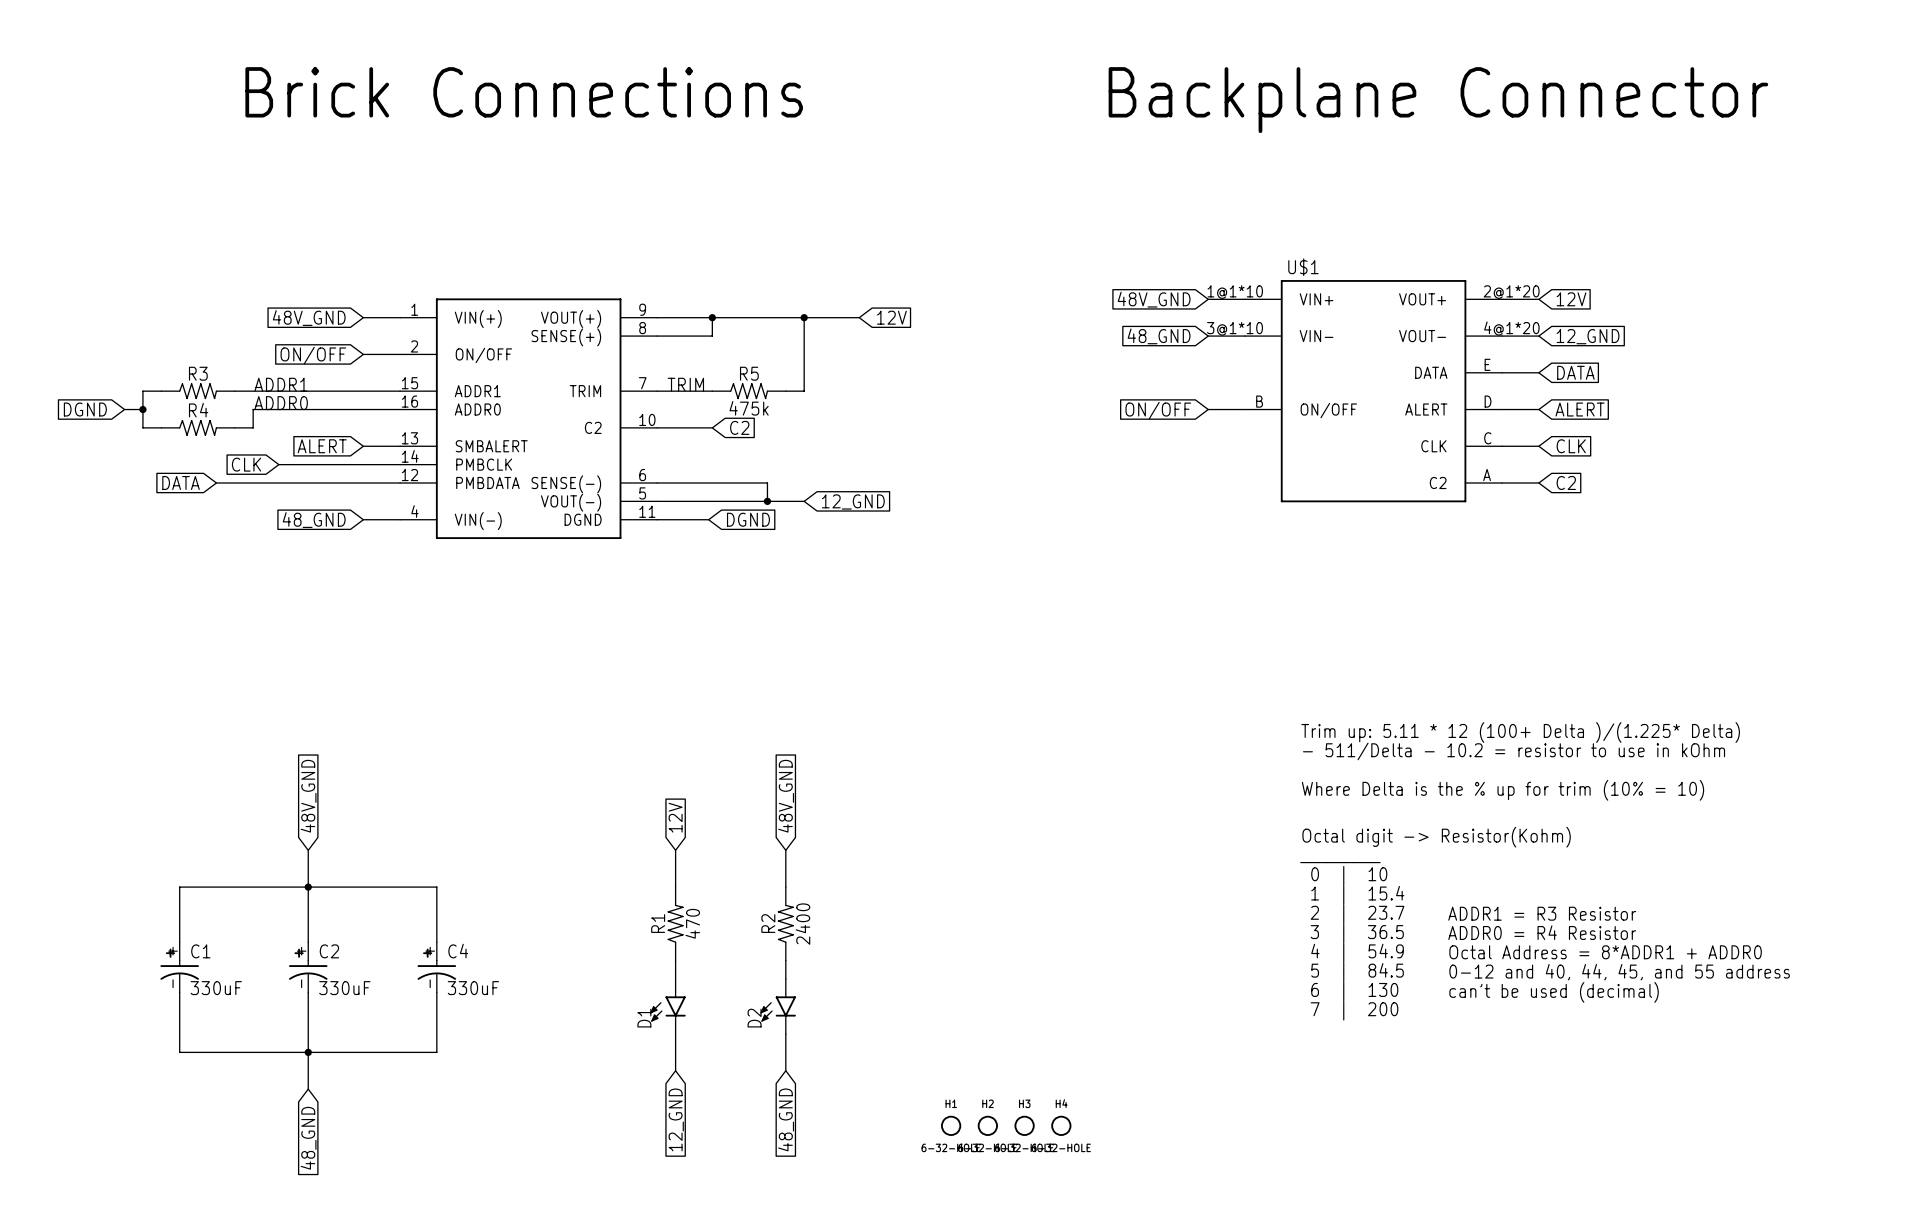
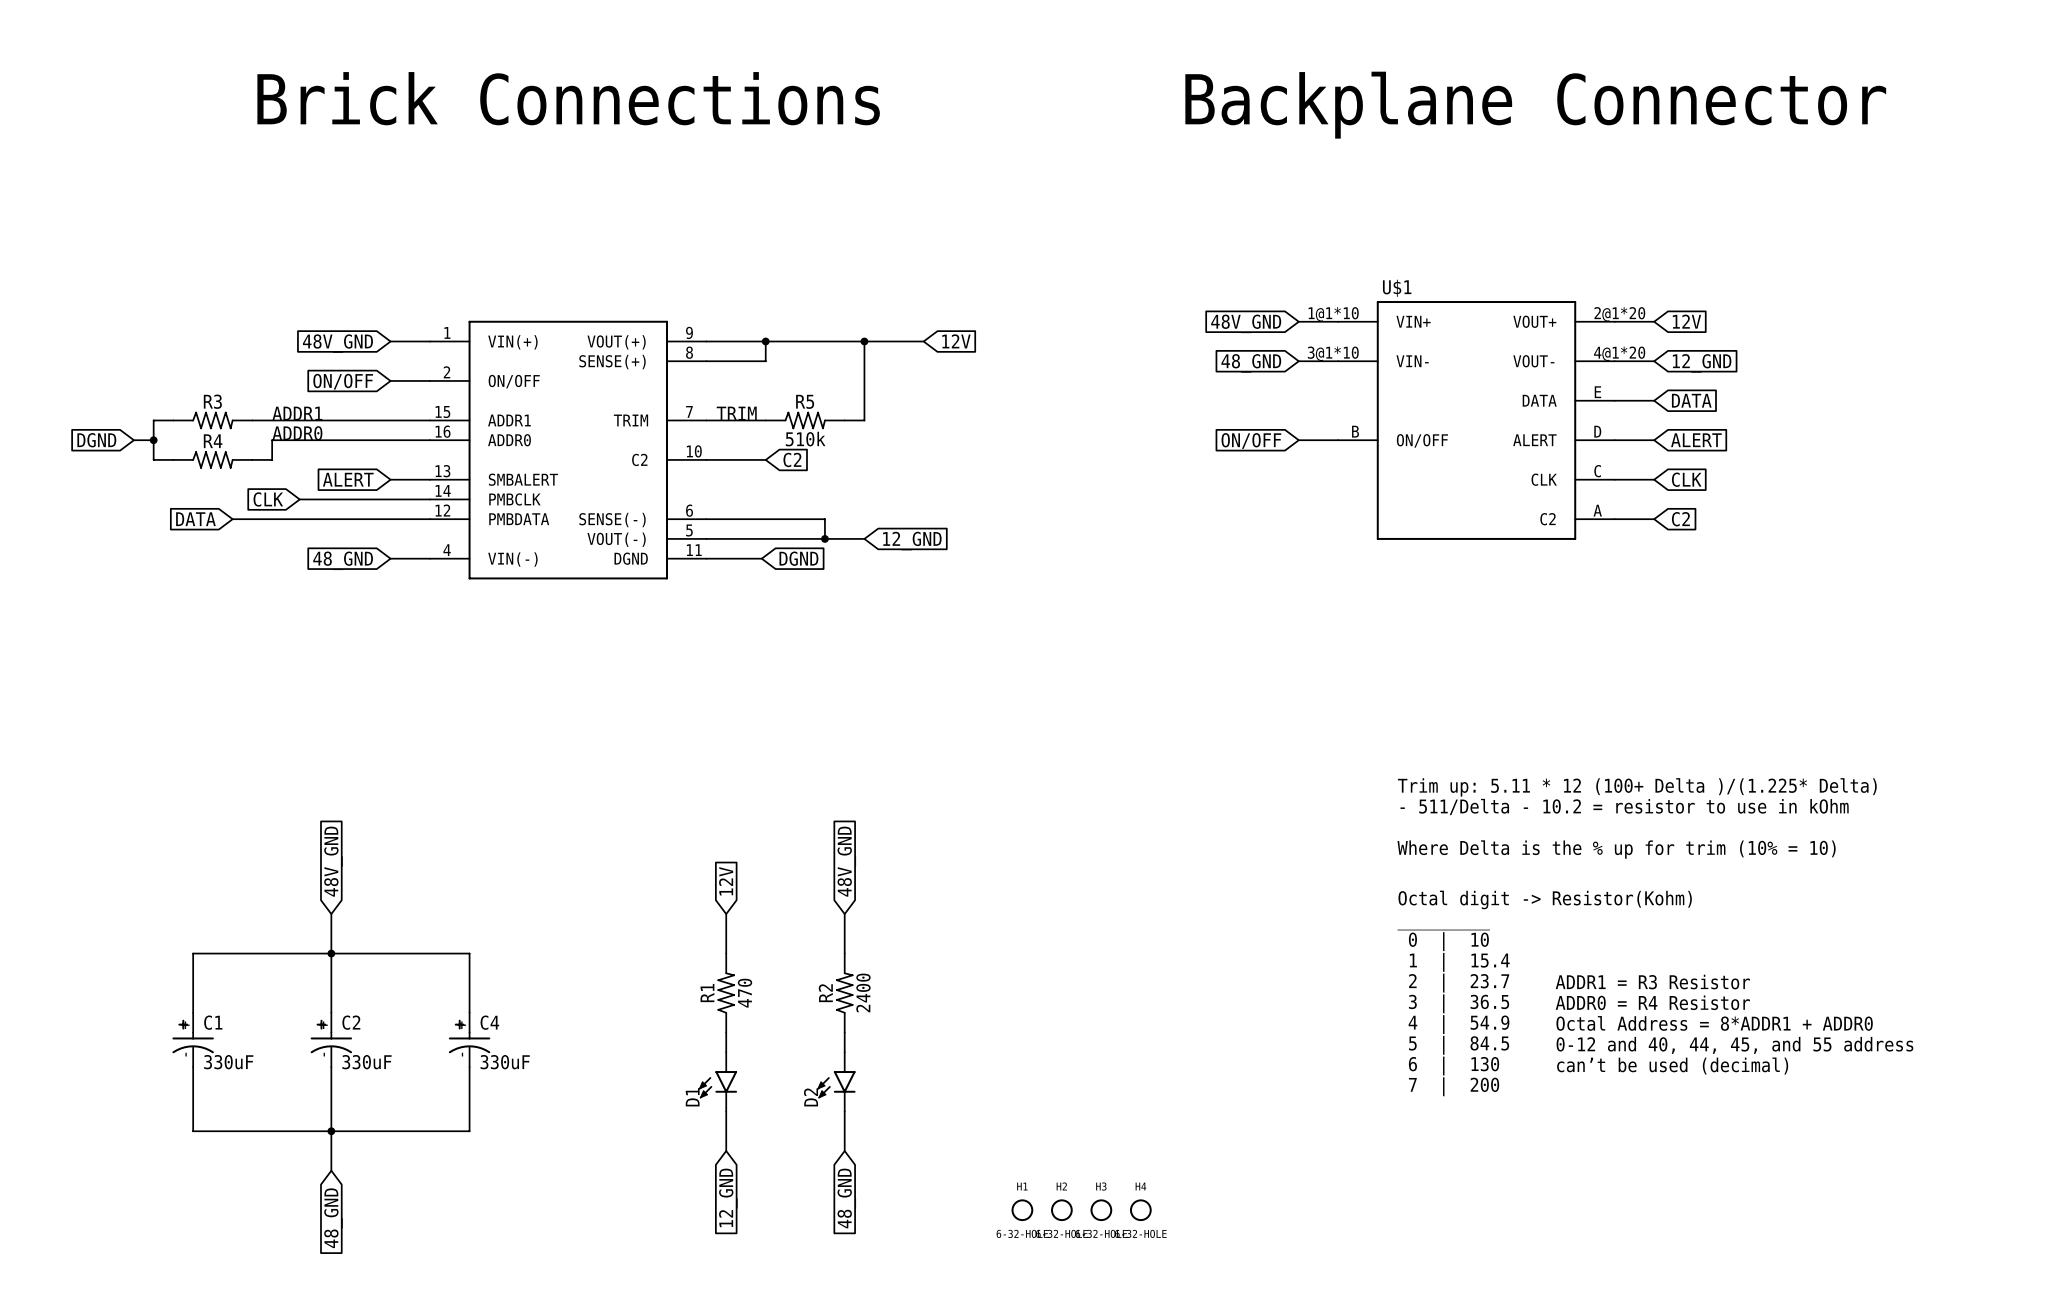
R5 value: 475k (749, 408) -> 510k (805, 439)

